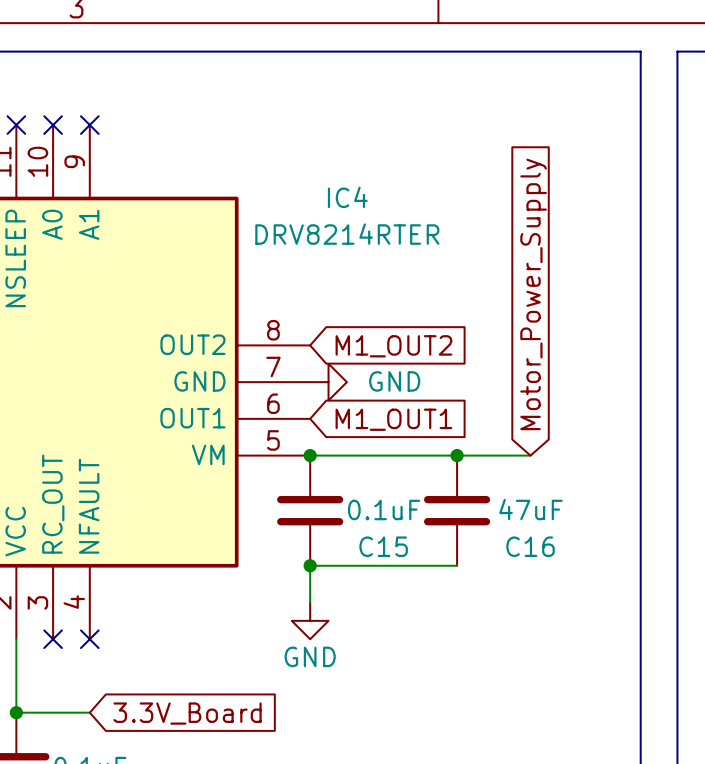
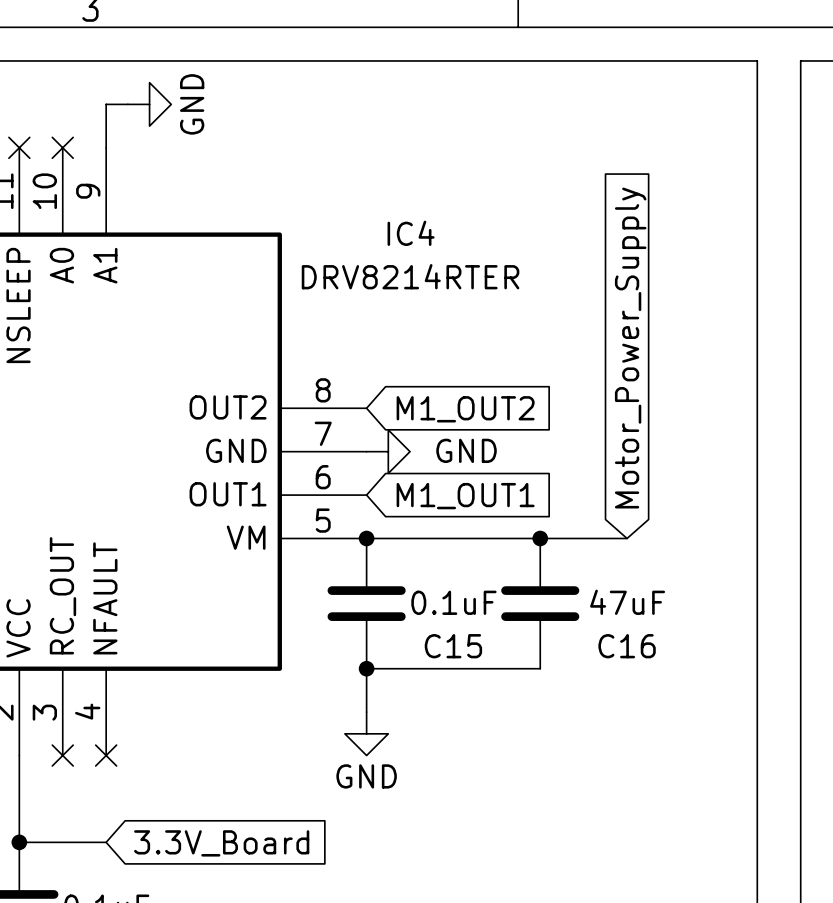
wire: none -> (127, 104) (106, 104) (106, 147)
power symbol: none -> GND (149, 104)
no-connect mark: (89, 125) -> none

